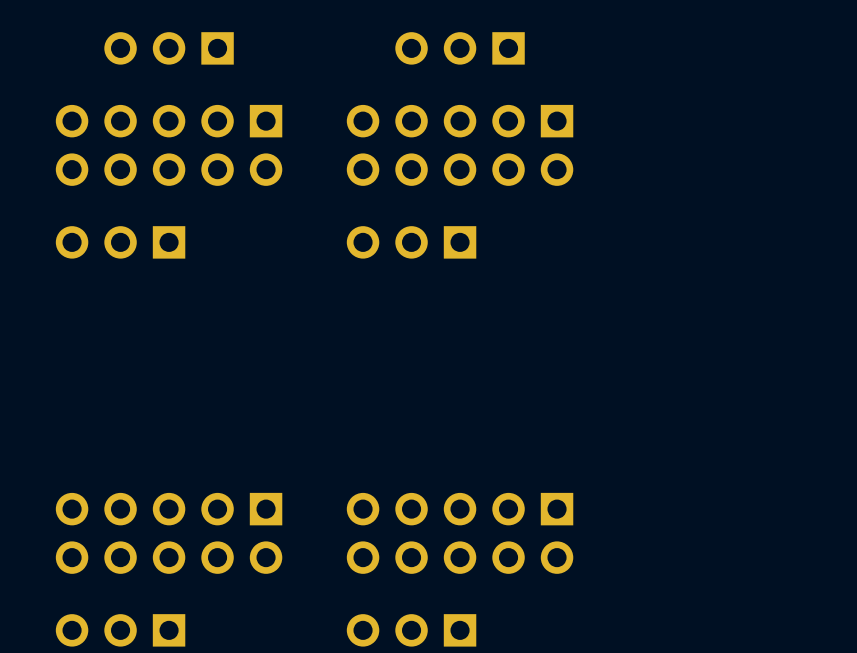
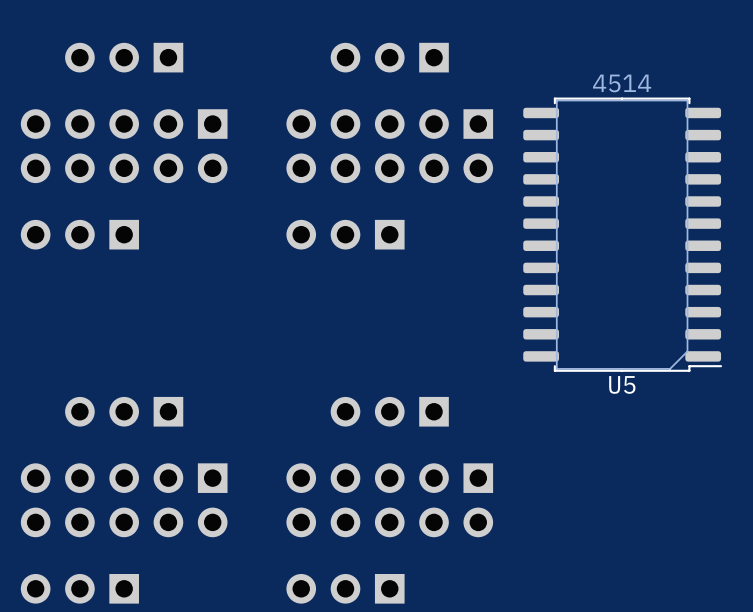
U5: none -> 4514 (622, 234)
part: none -> (124, 411)
part: none -> (389, 411)

